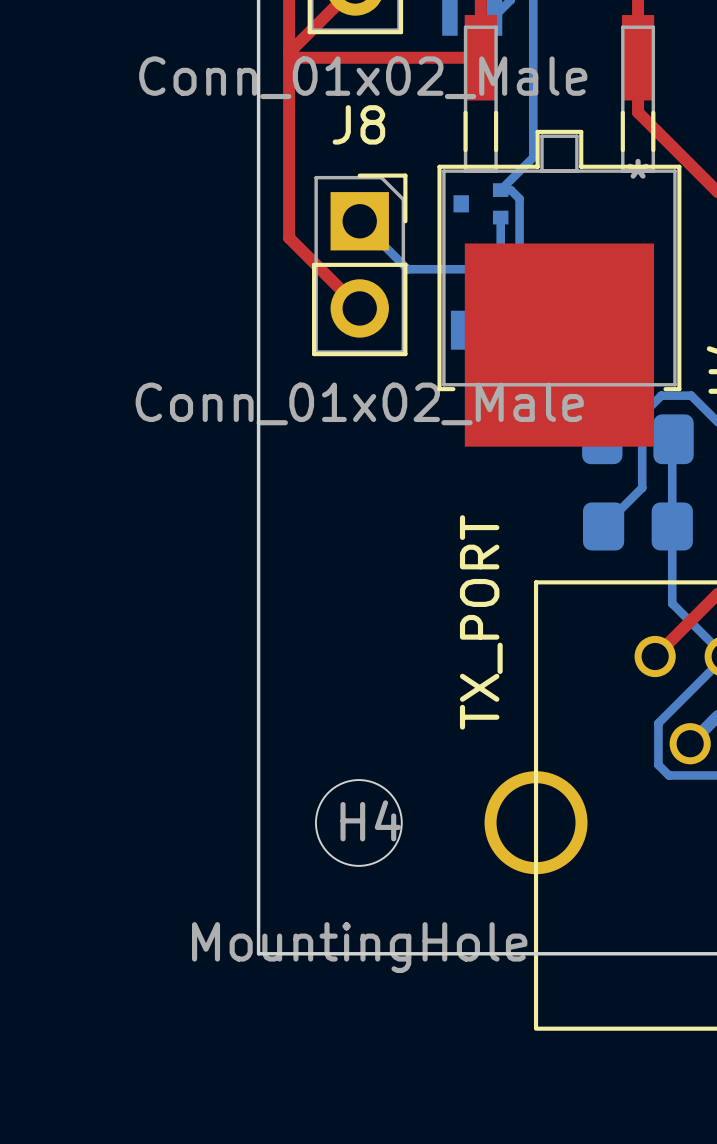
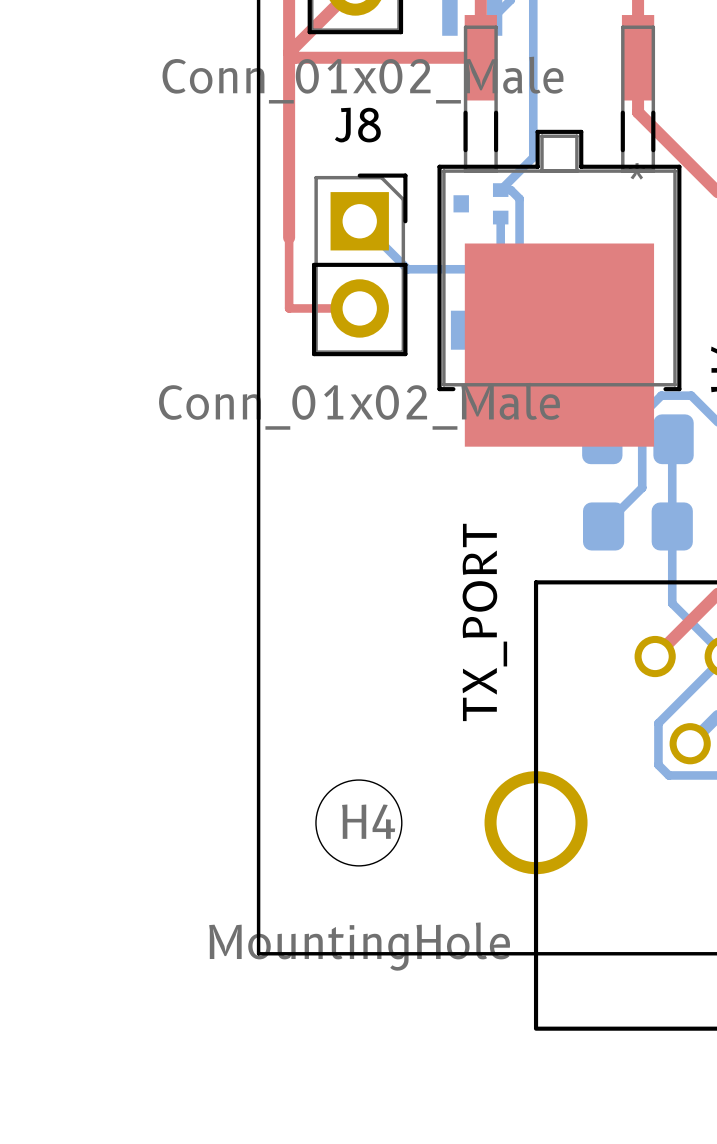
top track: (289, 237) (359, 308) -> (289, 237) (289, 308) (359, 308)

